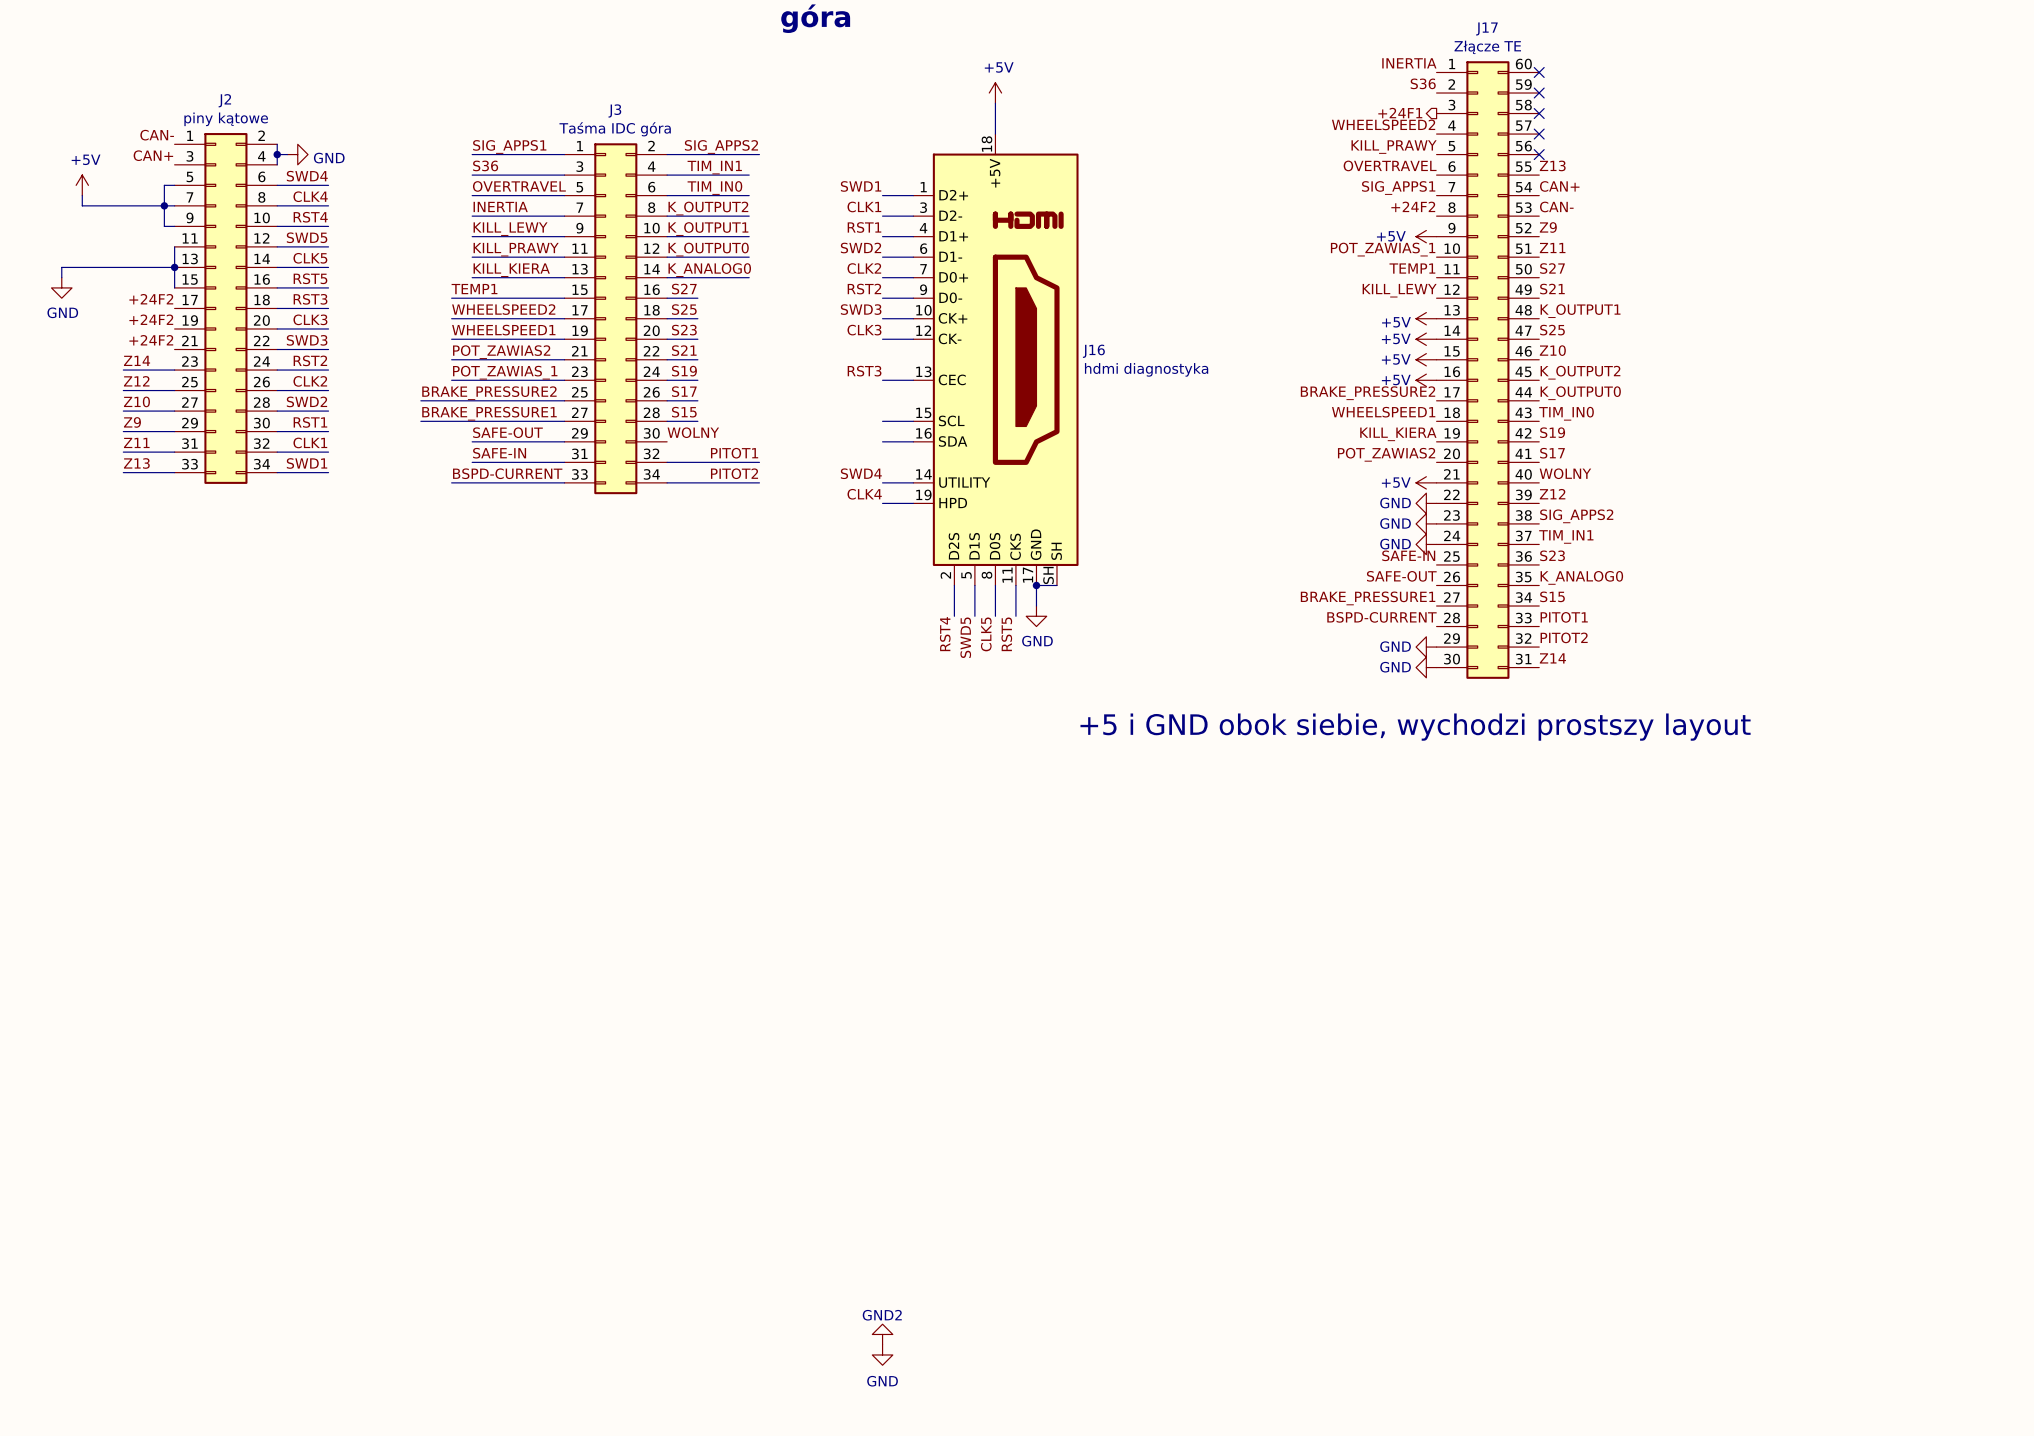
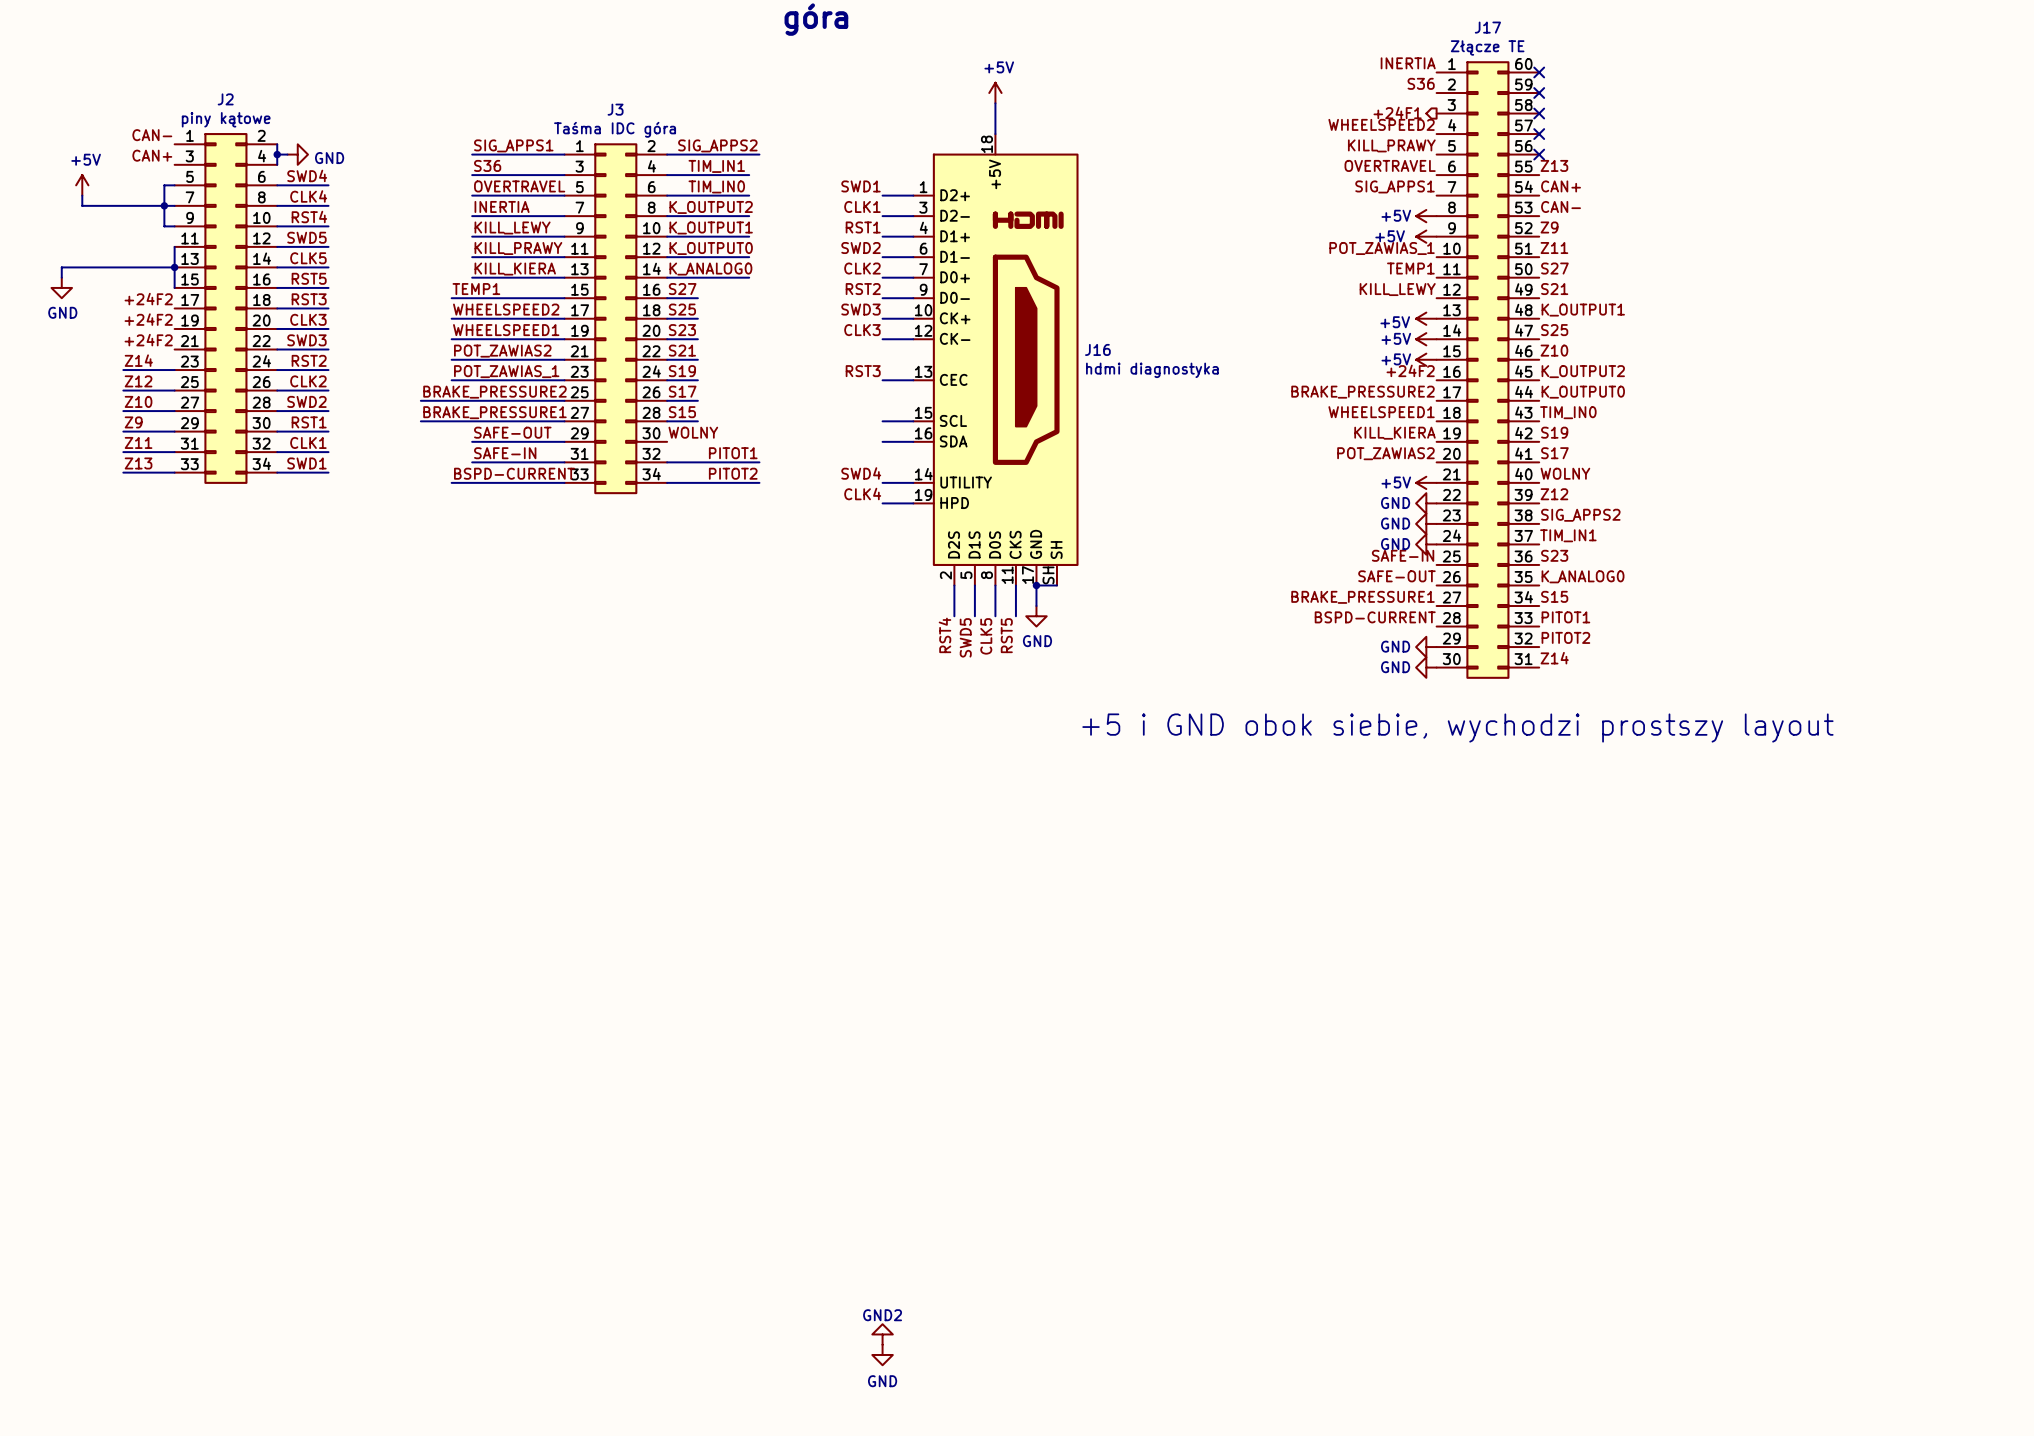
label position: +24F2 (1413, 206) -> +24F2 (1410, 370)
power symbol position: +5V (1426, 380) -> +5V (1426, 216)

